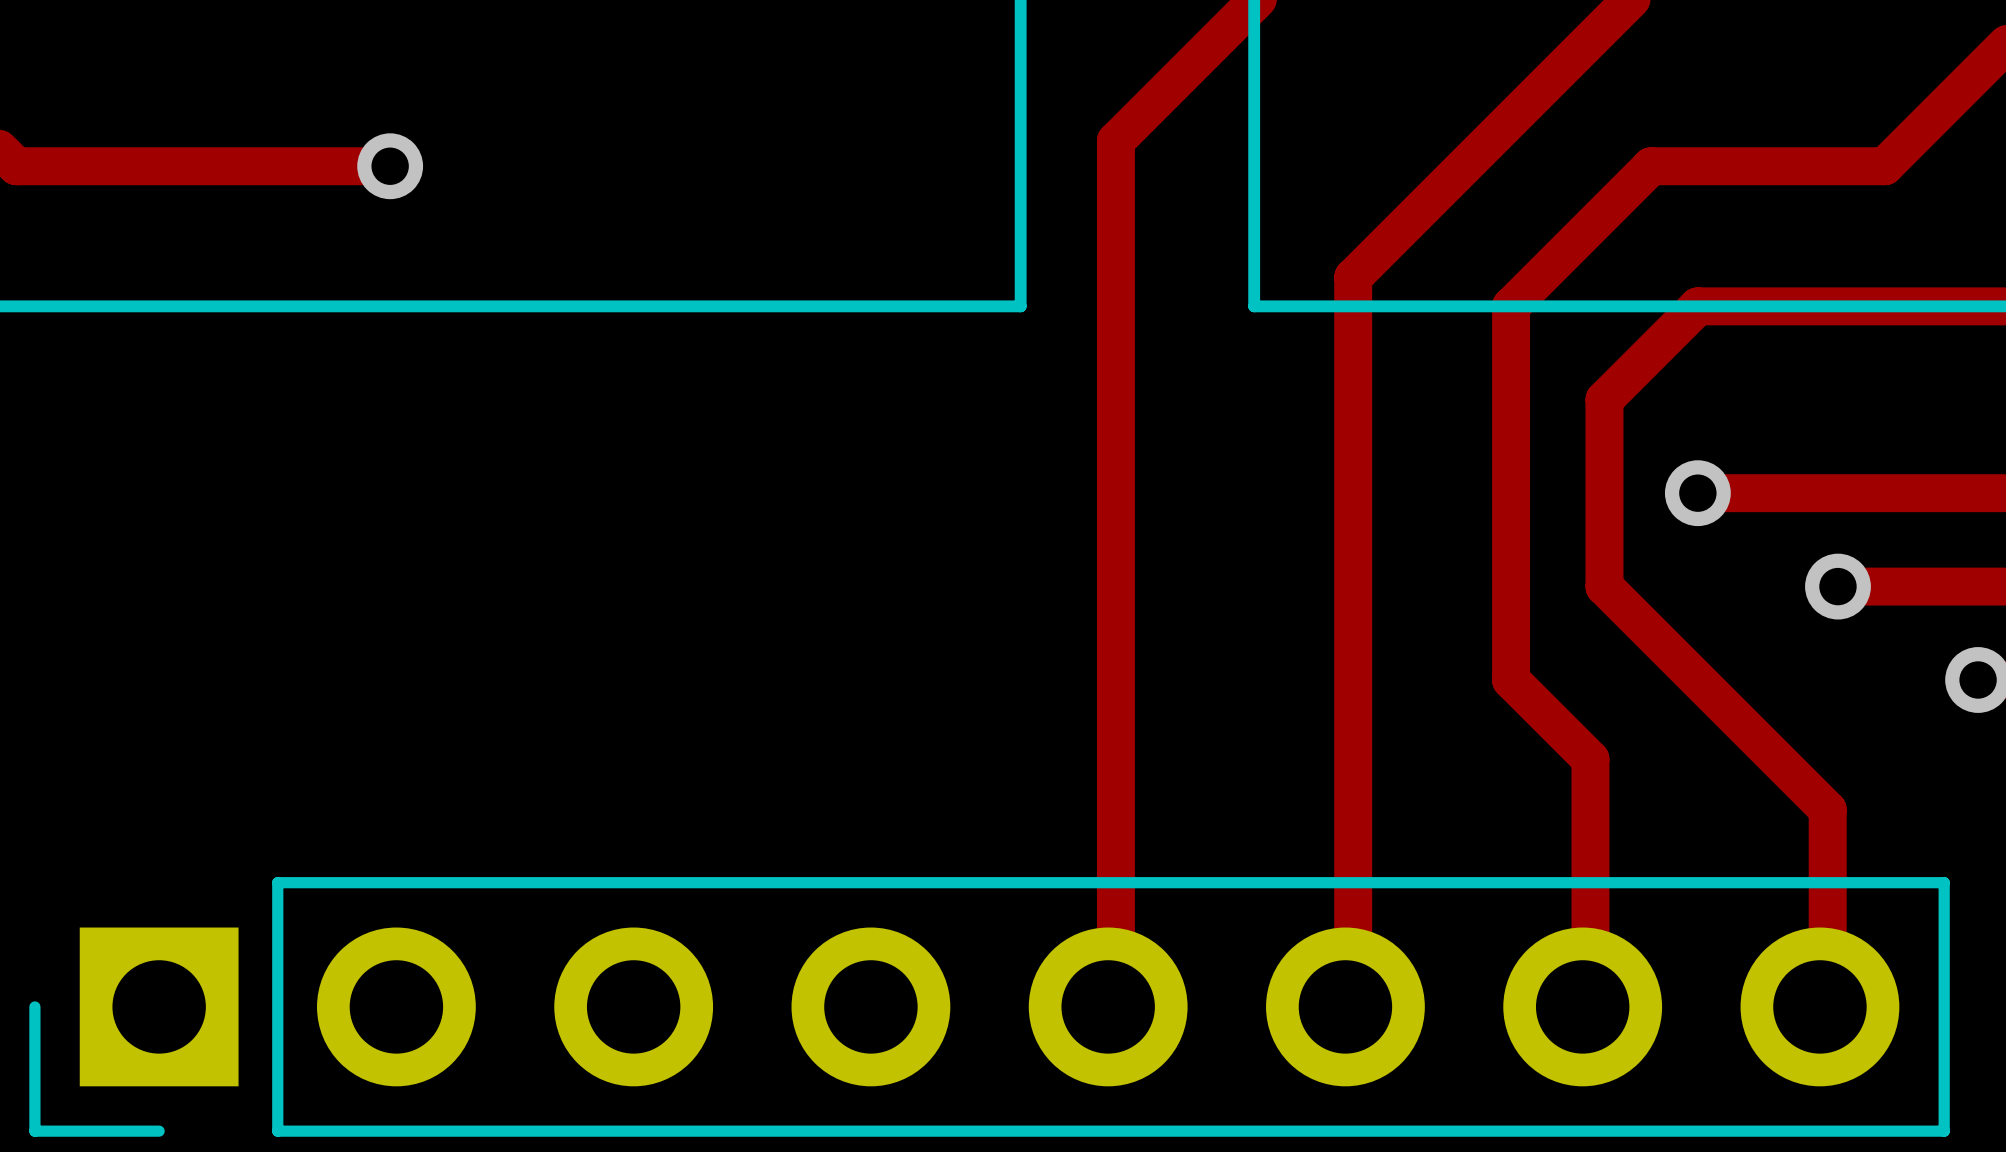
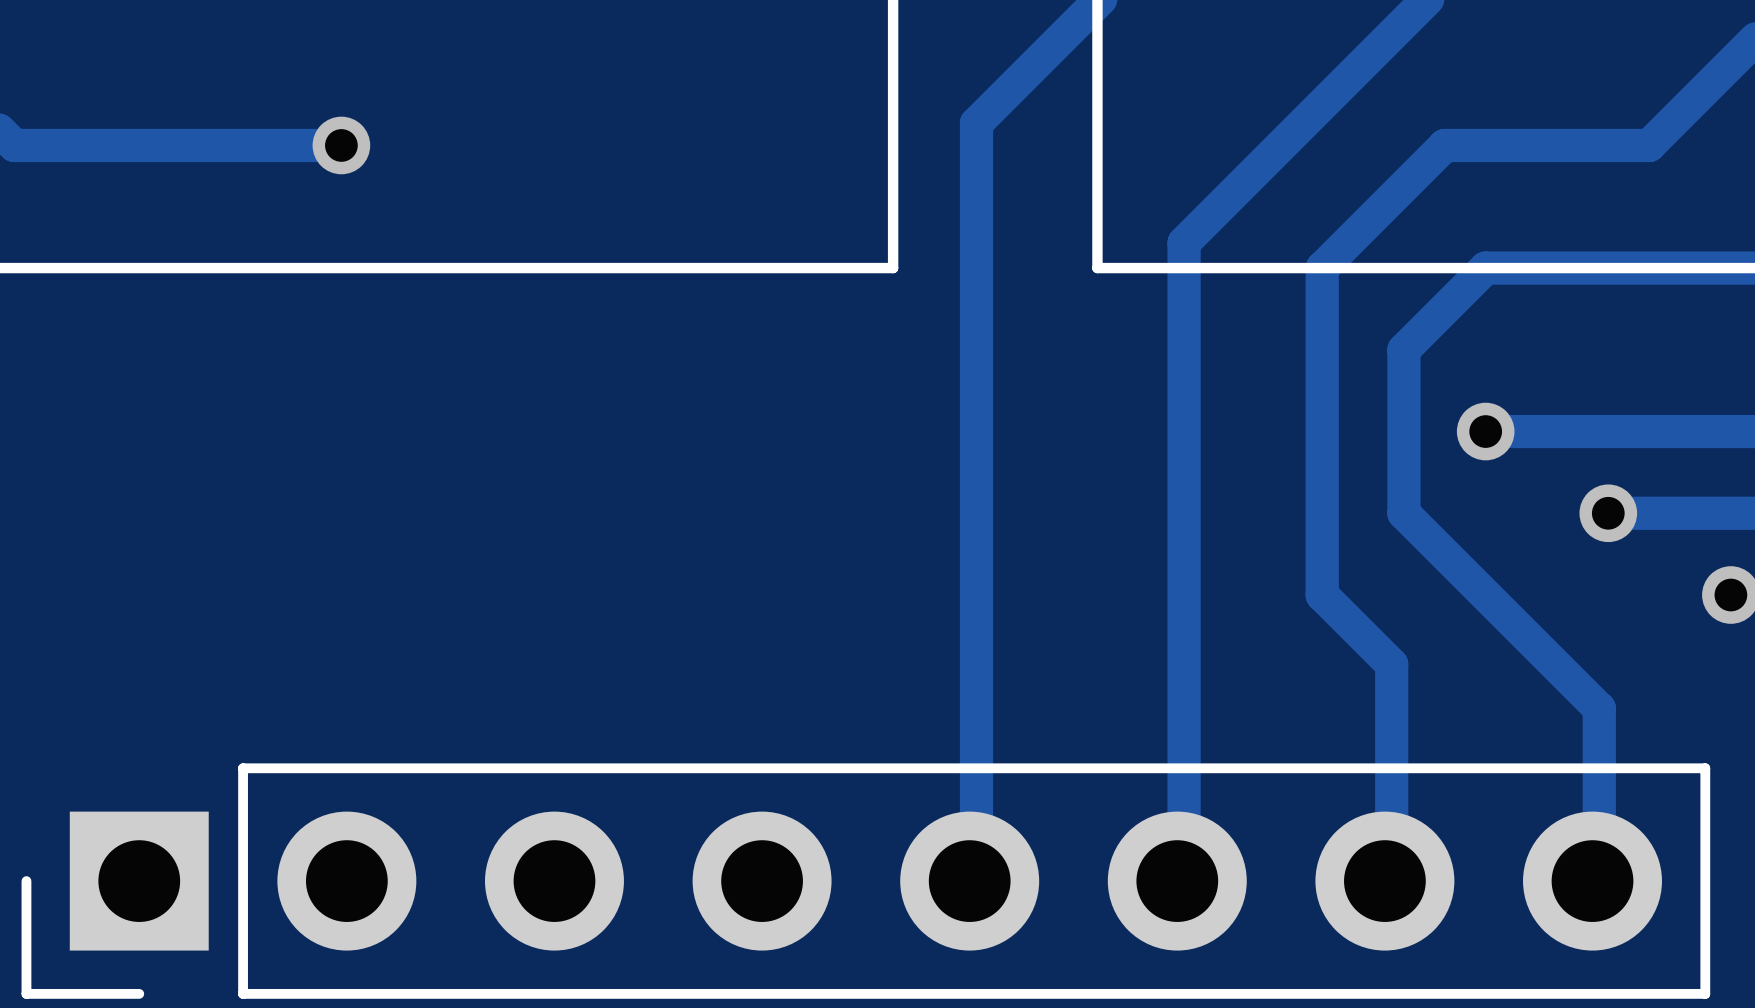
part footprint: [29, 877, 1950, 1137] -> [21, 763, 1711, 999]

